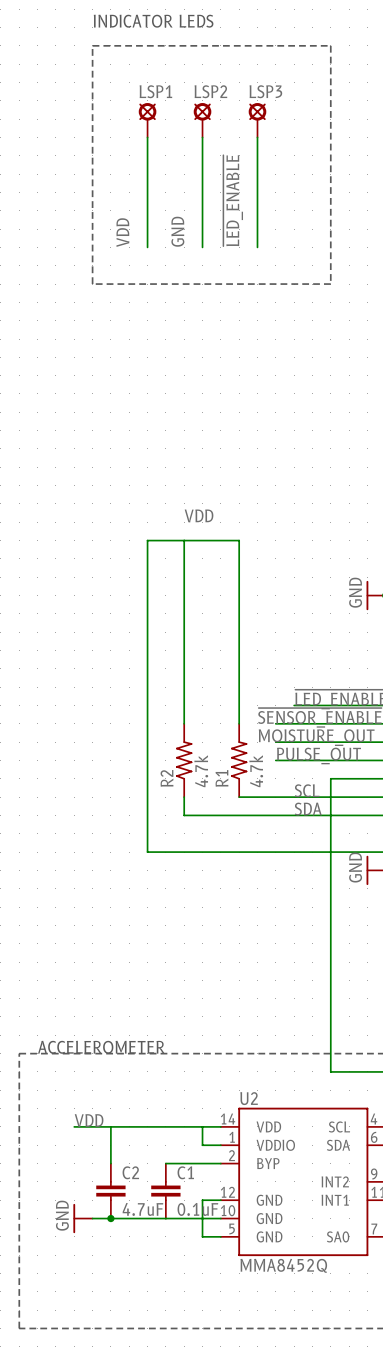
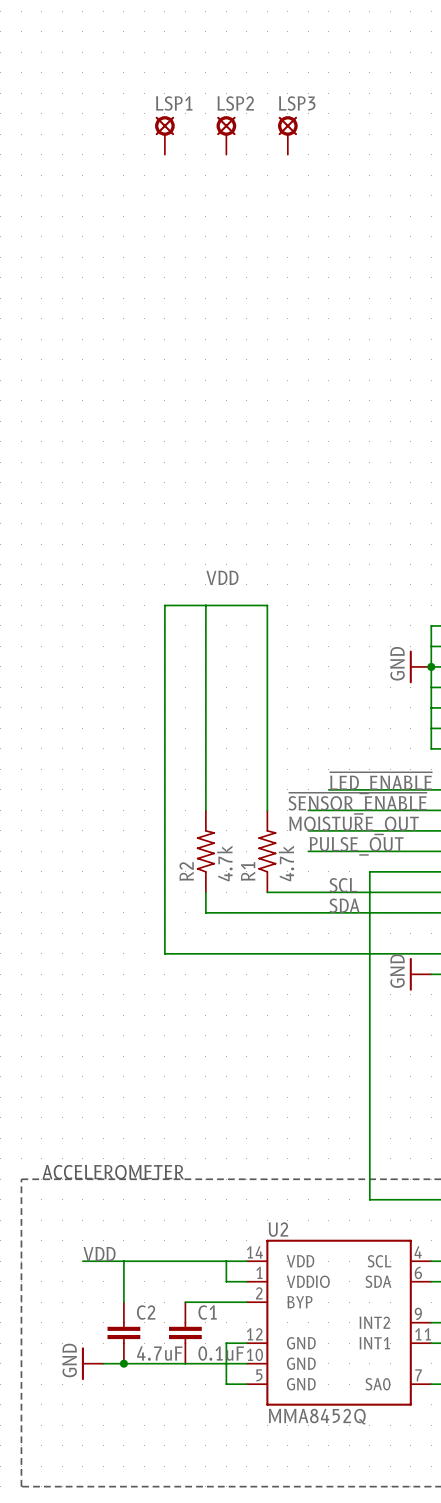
text: INDICATOR LEDS (153, 21) -> none
line: (92, 45) (330, 45) (330, 284) (92, 284) (92, 45) -> none
wire: (147, 137) (147, 247) -> none
wire: (202, 137) (202, 247) -> none
wire: (257, 137) (257, 247) -> none
label: ~{LED_ENABLE} (233, 200) -> none
label: GND (177, 231) -> none
label: VDD (122, 232) -> none

